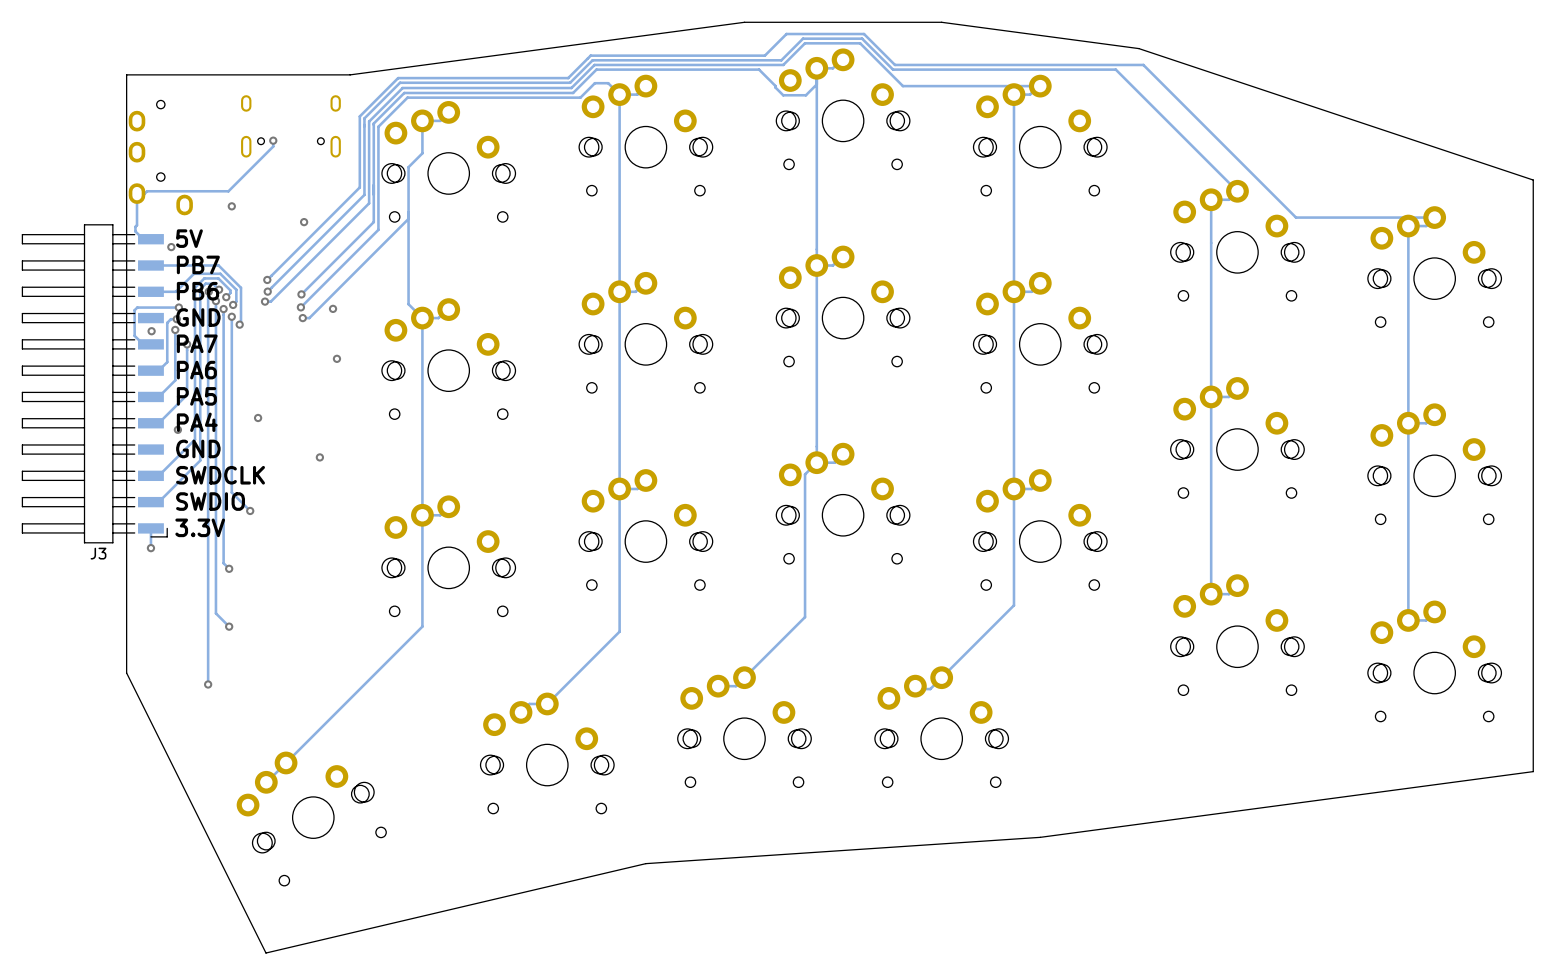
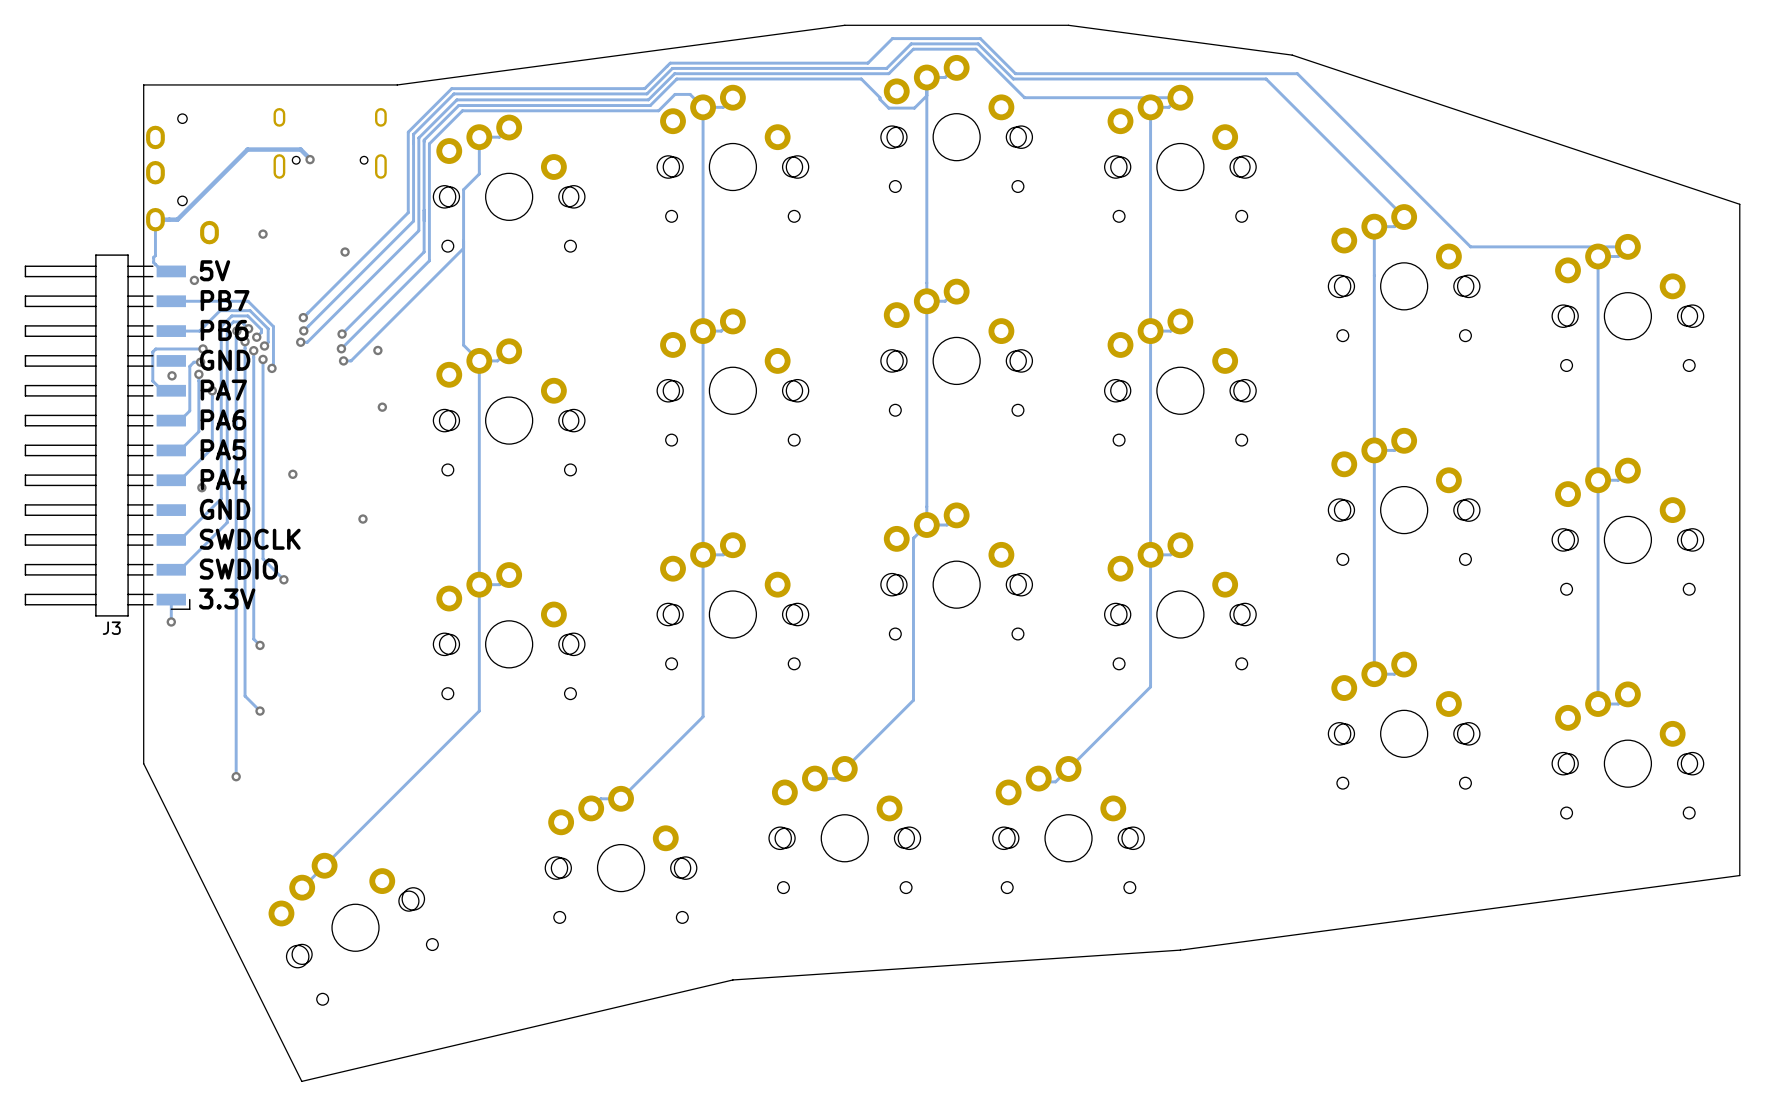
track: (273, 140) (273, 146) (228, 191) (147, 191) (144, 193) -> (309, 158) (300, 149) (247, 149) (177, 219) (164, 219)

